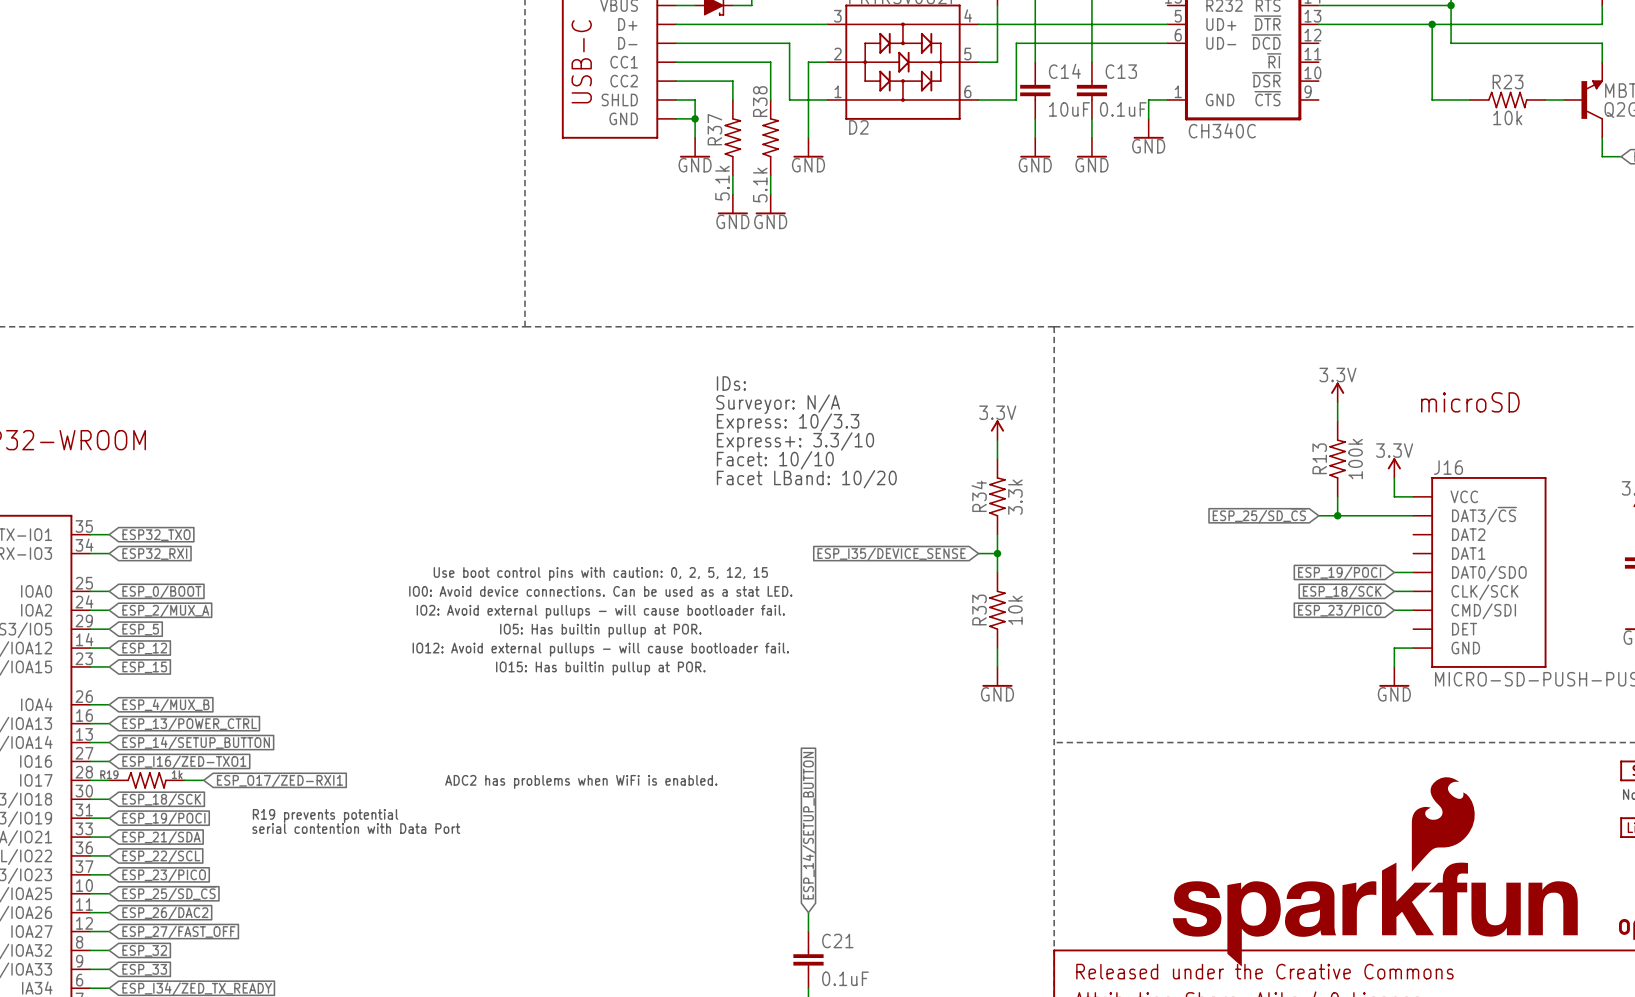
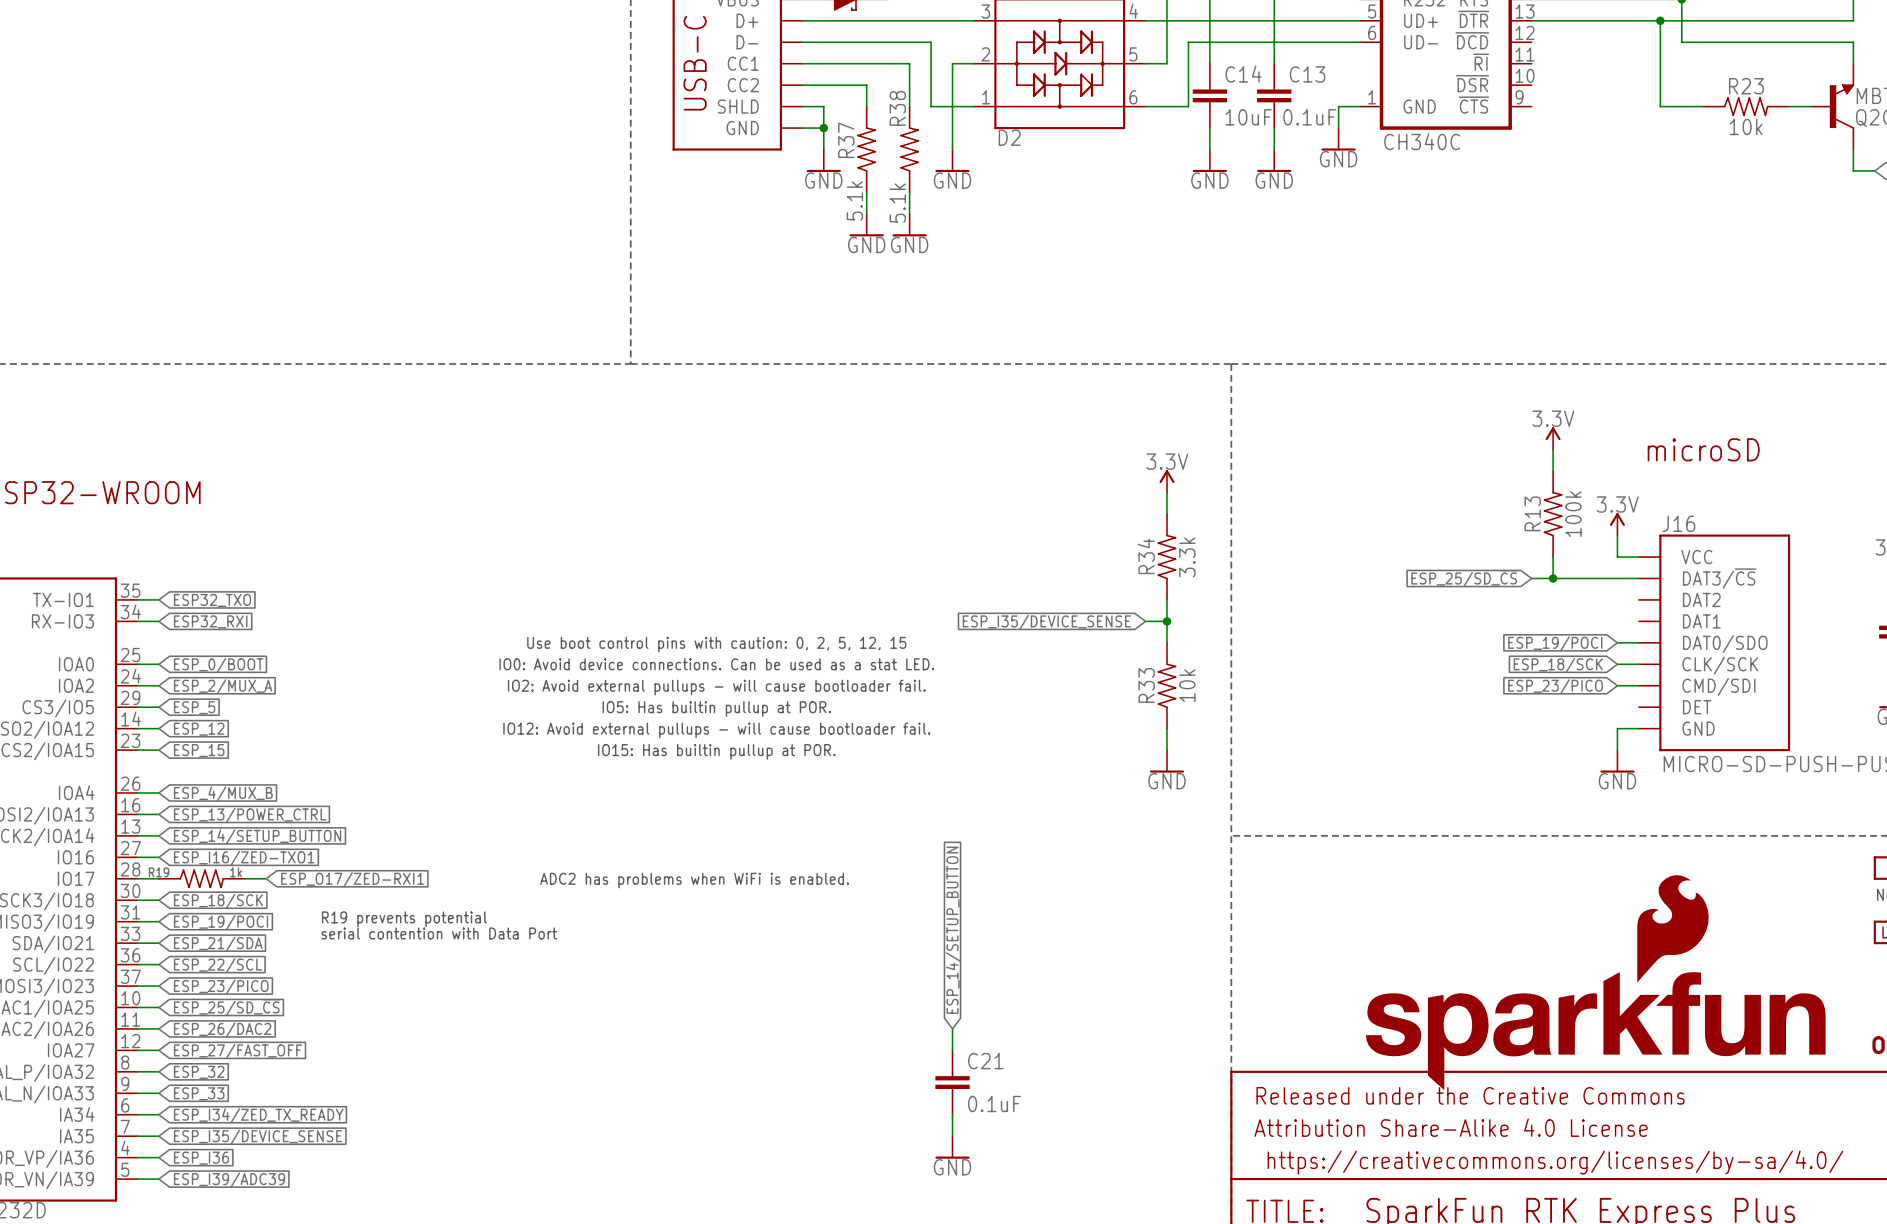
text: IDs: (731, 383) -> none
text: Surveyor: N/A (778, 404) -> none
text: Express: 10/3.3 (788, 423) -> none
text: Express+: 3.3/10 (795, 442) -> none
text: Facet: 10/10 (775, 460) -> none
text: Facet LBand: 10/20 (806, 479) -> none

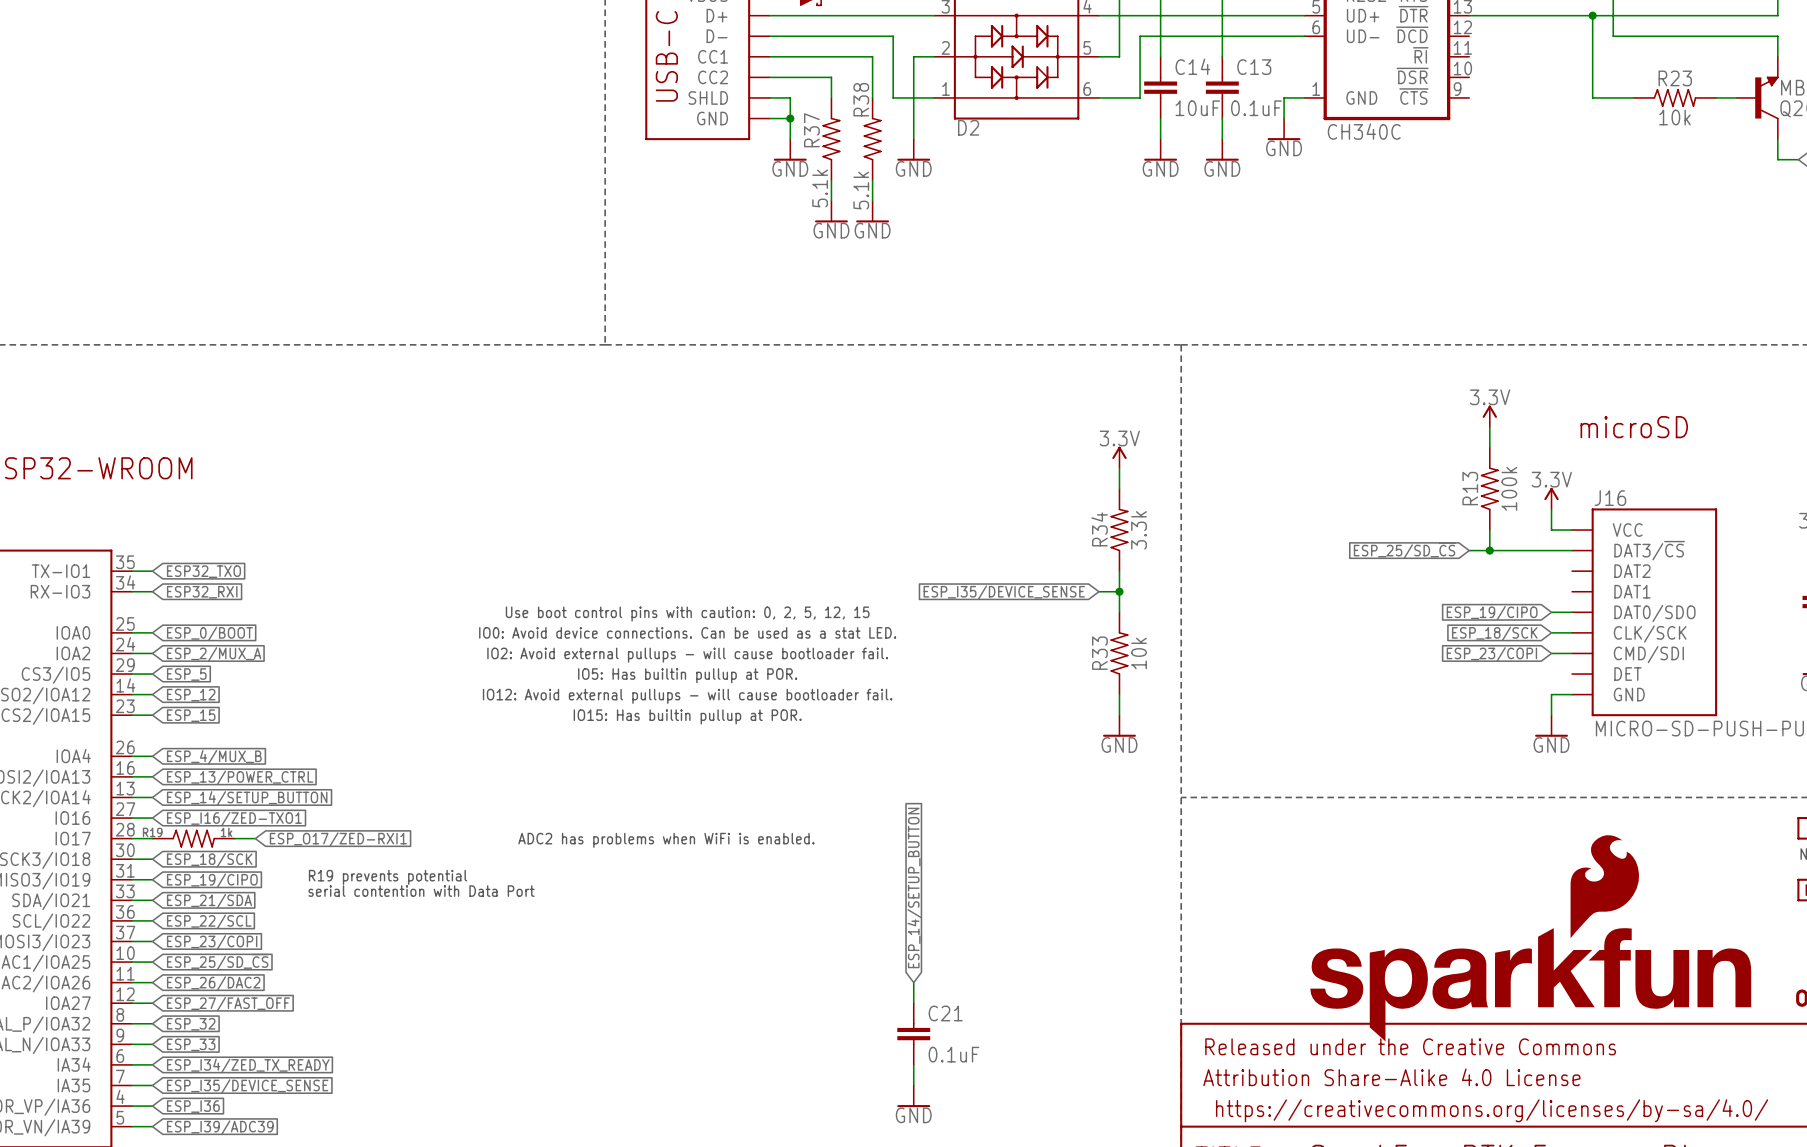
global label: ESP_19/POCI (1555, 643) -> ESP_19/CIPO (1492, 613)
global label: ESP_23/PICO (1555, 686) -> ESP_23/COPI (1491, 654)
global label: ESP_19/POCI (221, 922) -> ESP_19/CIPO (212, 880)
global label: ESP_23/PICO (221, 987) -> ESP_23/COPI (212, 942)

